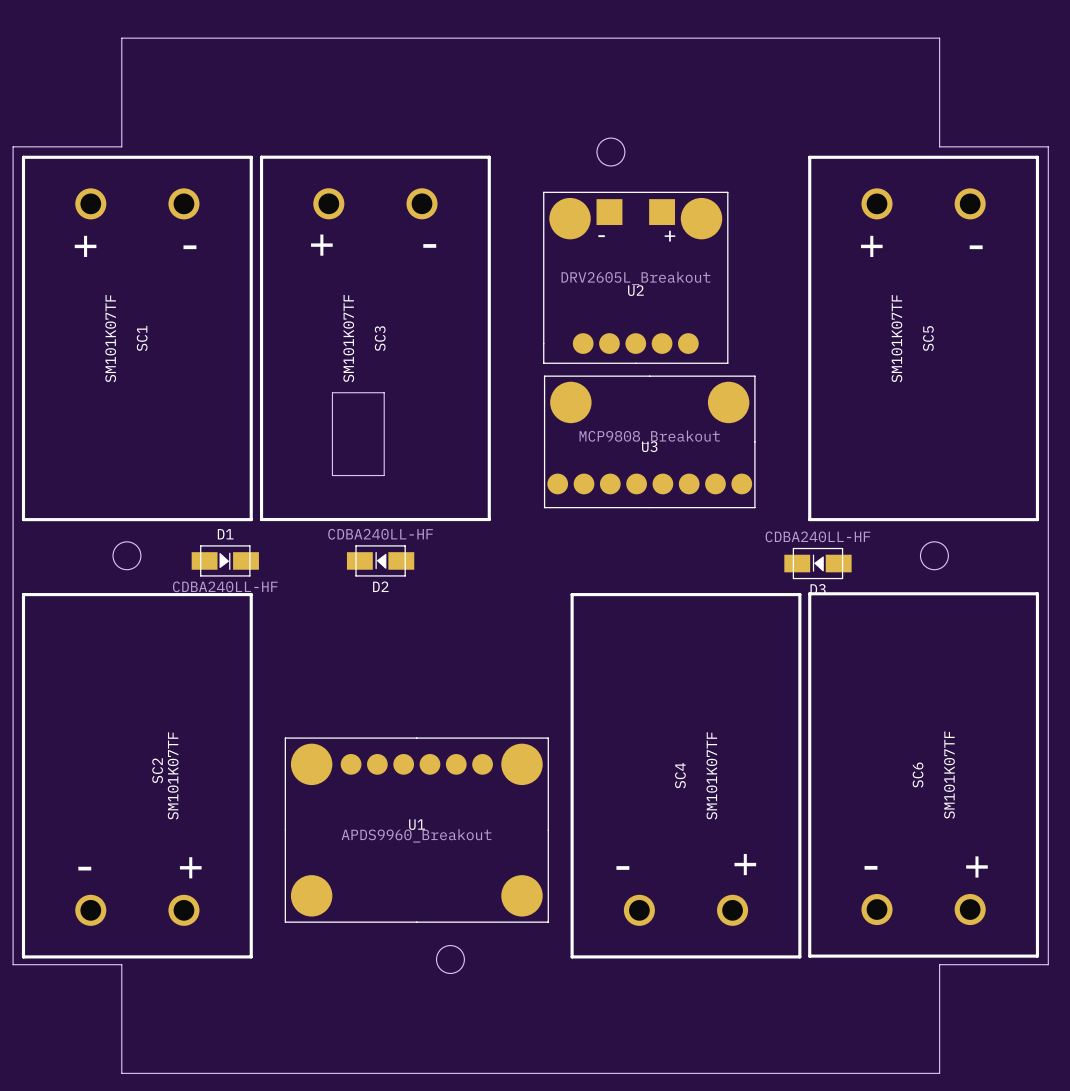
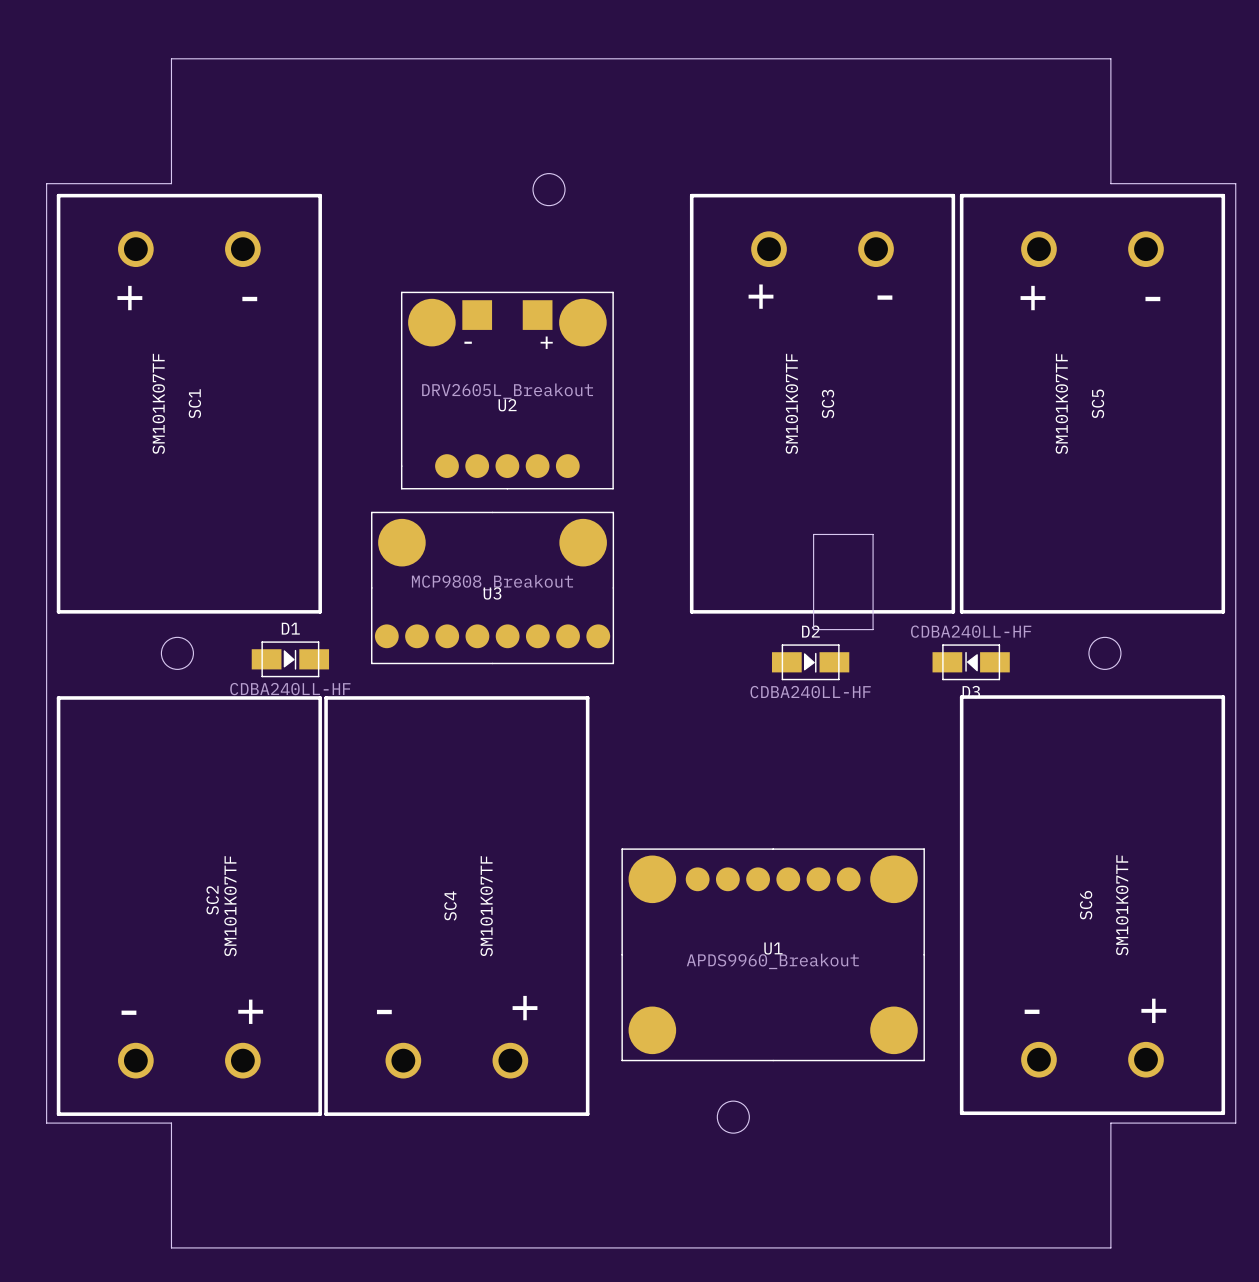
round board edge position: (610, 152) -> (549, 189)
U2 position: (635, 277) -> (507, 390)
SC3 position: (375, 338) -> (822, 403)
board edge: (332, 392) (332, 475) (384, 475) (384, 392) (332, 392) -> none
U3 position: (649, 441) -> (492, 587)
board edge: none -> (813, 534) (813, 629) (873, 629) (873, 534) (813, 534)
D2 rotation: 0° (380, 560) -> 180° (810, 662)
D2 position: (380, 560) -> (810, 662)
SC4 position: (685, 775) -> (456, 906)
U1 position: (416, 830) -> (773, 954)
round board edge position: (450, 959) -> (733, 1117)

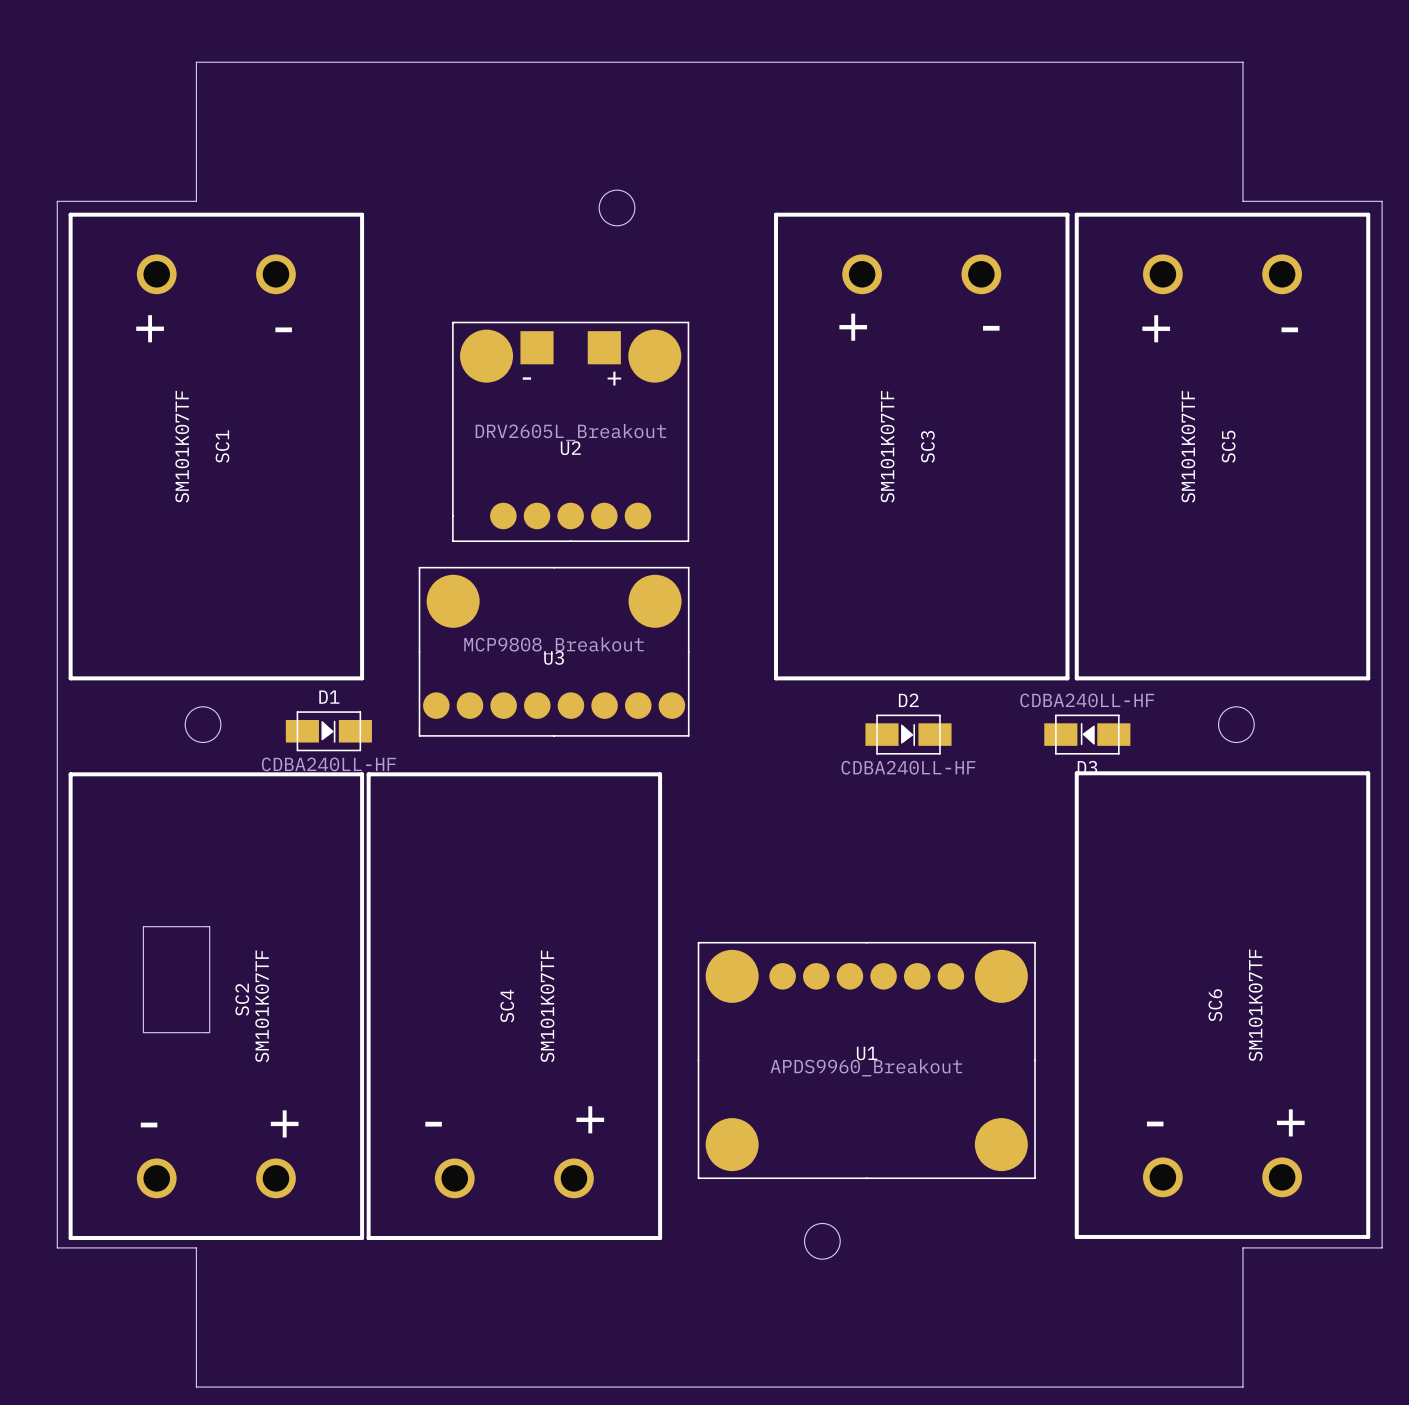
board edge: (813, 534) (813, 629) (873, 629) (873, 534) (813, 534) -> none
board edge: none -> (143, 926) (209, 926) (209, 1032) (143, 1032) (143, 926)

